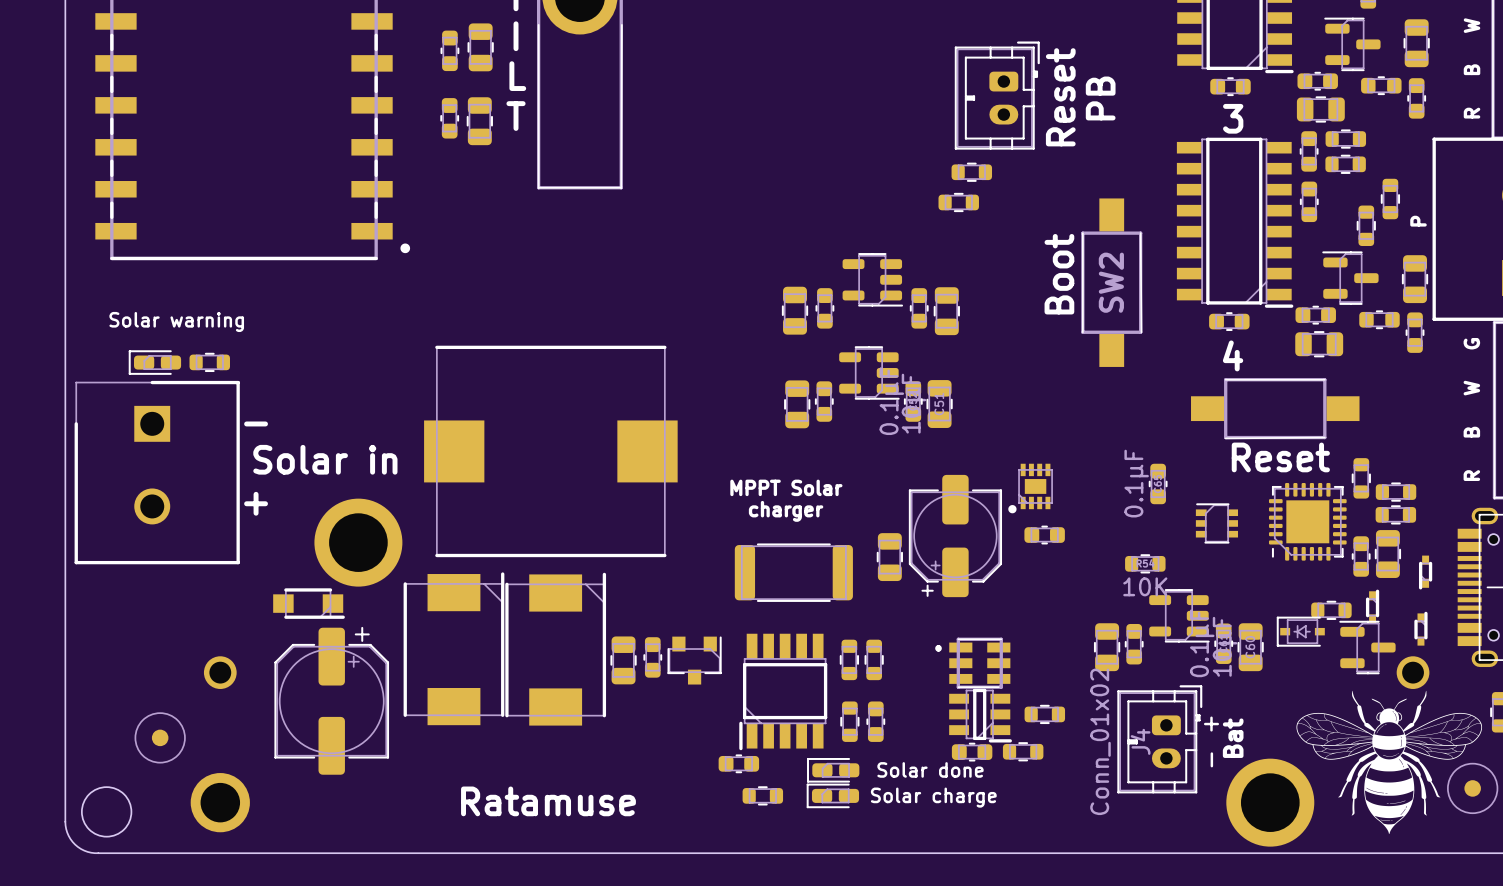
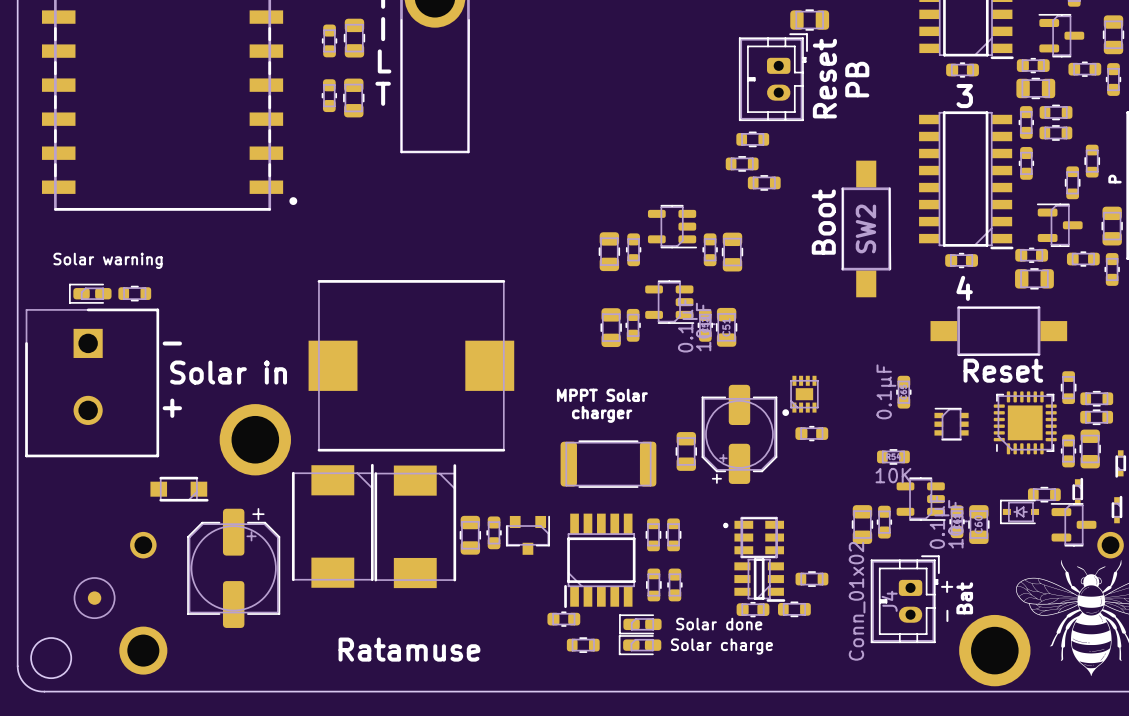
part: none -> (809, 20)
part: none -> (764, 182)
part position: (309, 603) -> (179, 489)

